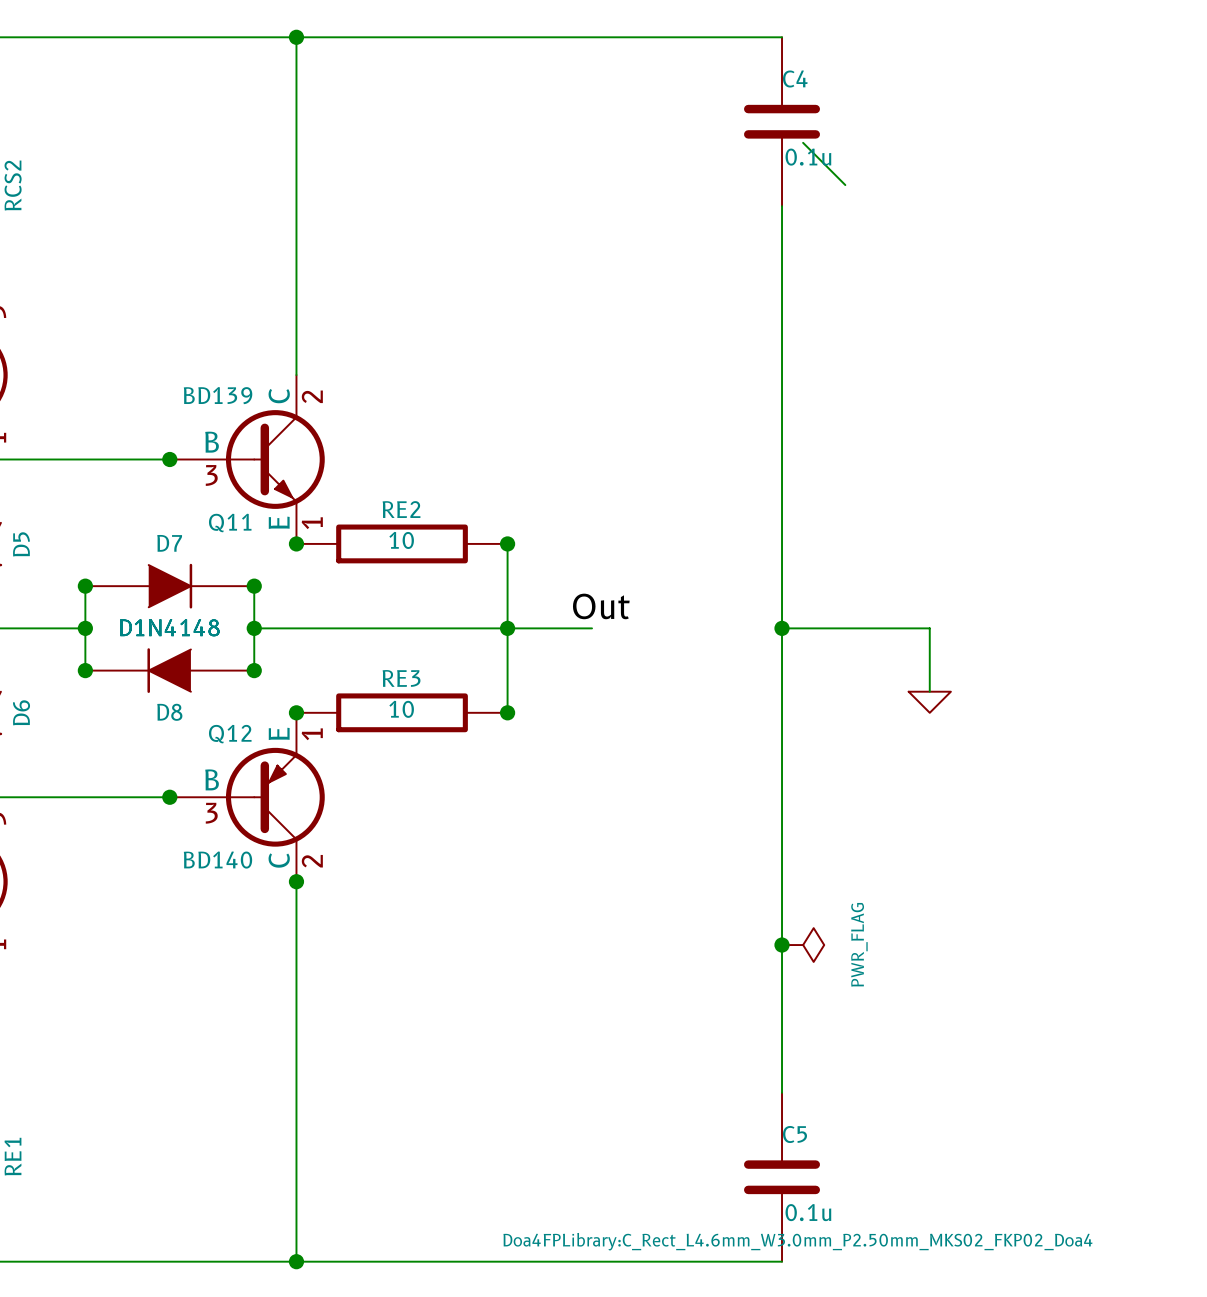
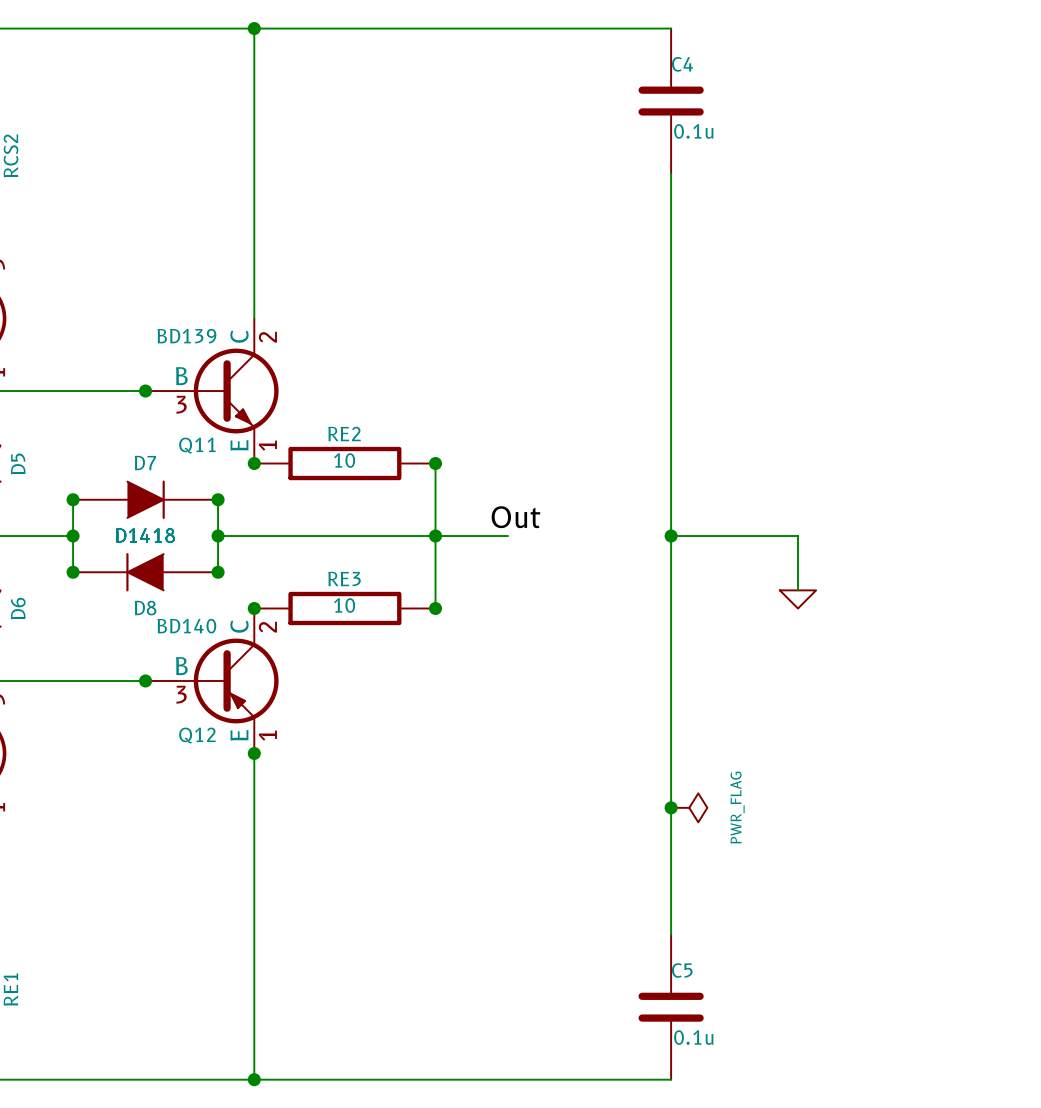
wire: (803, 142) (845, 185) -> none
D7 value: D1N4148 (169, 627) -> D1418 (145, 535)
D8 value: D1N4148 (169, 627) -> D1418 (145, 535)
Q12 flip: as is (275, 797) -> up-down (236, 680)
C5 text: Doa4FPLibrary:C_Rect_L4.6mm_W3.0mm_P2.50mm_MKS02_FKP02_Doa4 (797, 1241) -> none

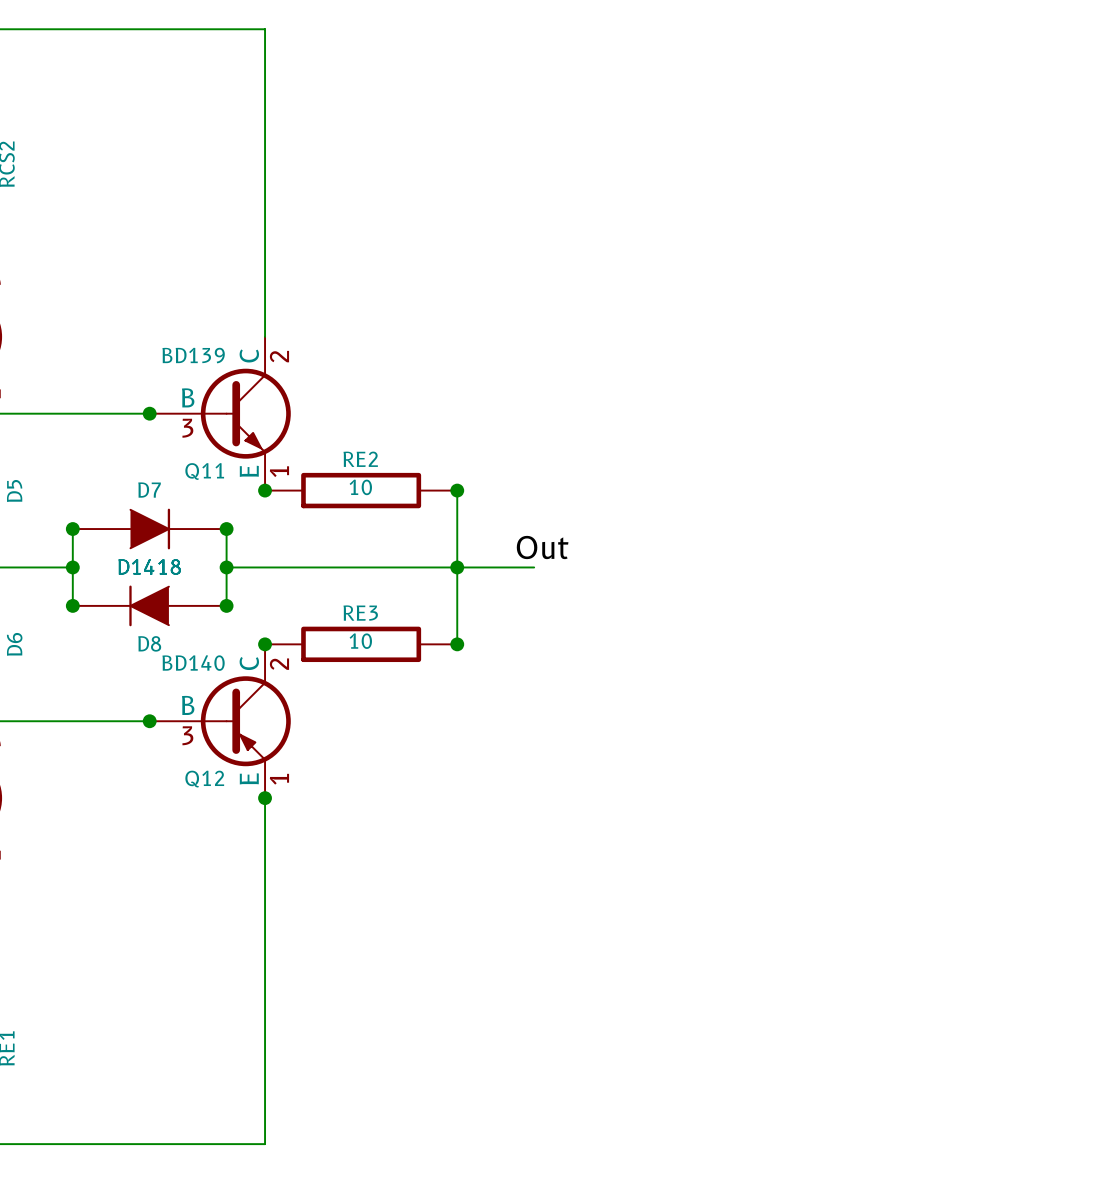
wire: (254, 28) (671, 28) -> none
junction: (254, 28) -> none
C4: 0.1u (671, 101) -> none
wire: (671, 173) (671, 934) -> none
wire: (671, 536) (797, 536) (797, 590) -> none
junction: (671, 536) -> none
power symbol: (797, 599) -> none
junction: (671, 807) -> none
power symbol: PWR_FLAG (689, 807) -> none
C5: 0.1u (671, 1007) -> none
wire: (254, 1079) (671, 1079) -> none
junction: (254, 1079) -> none

